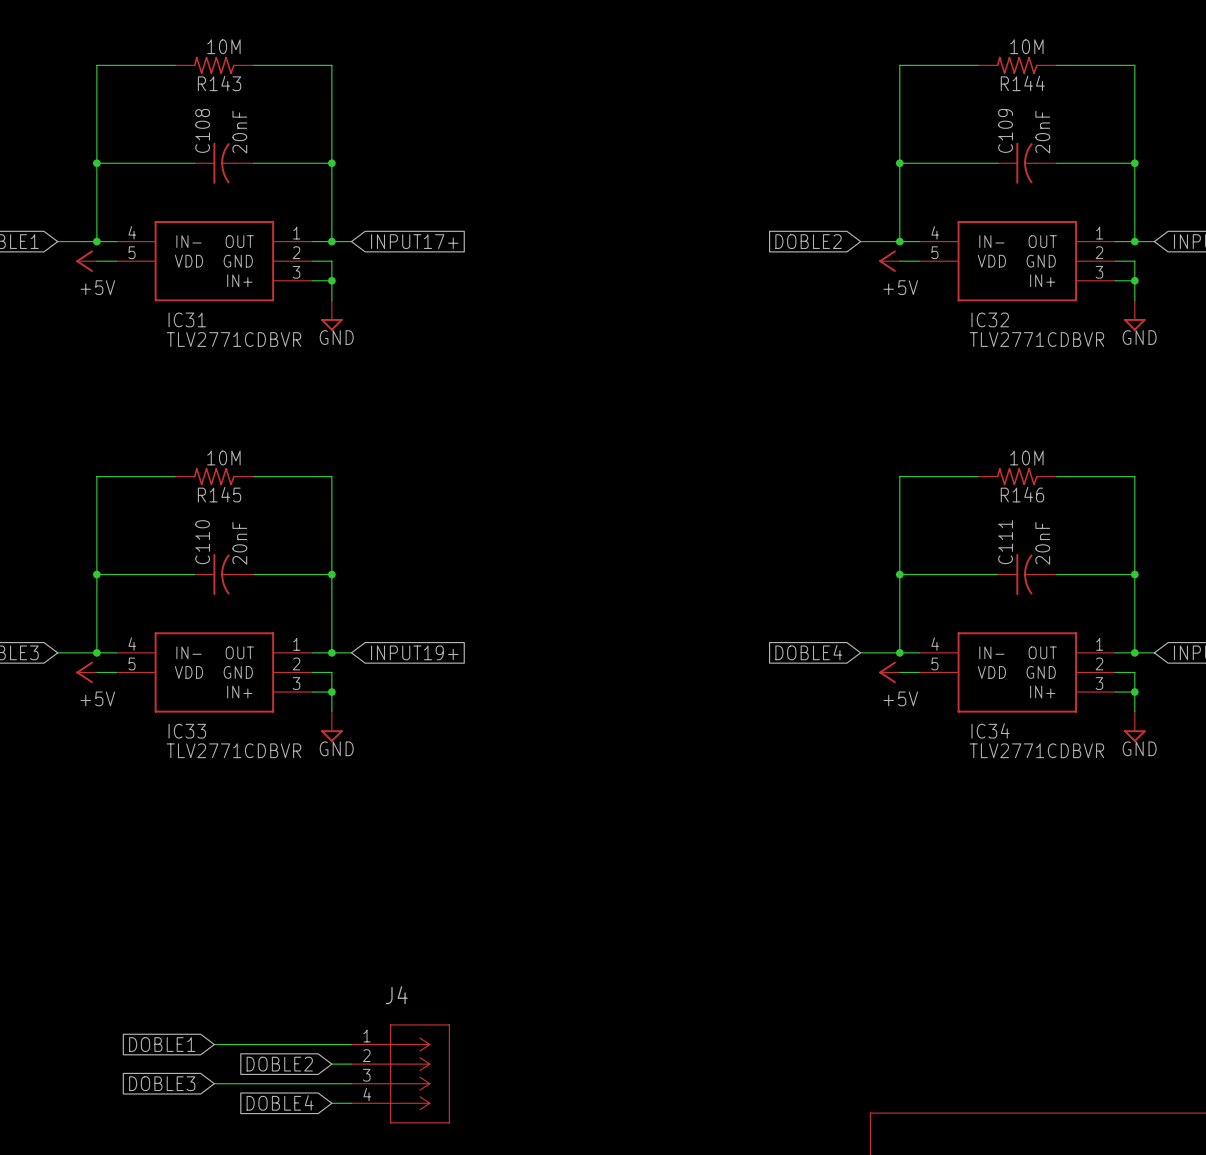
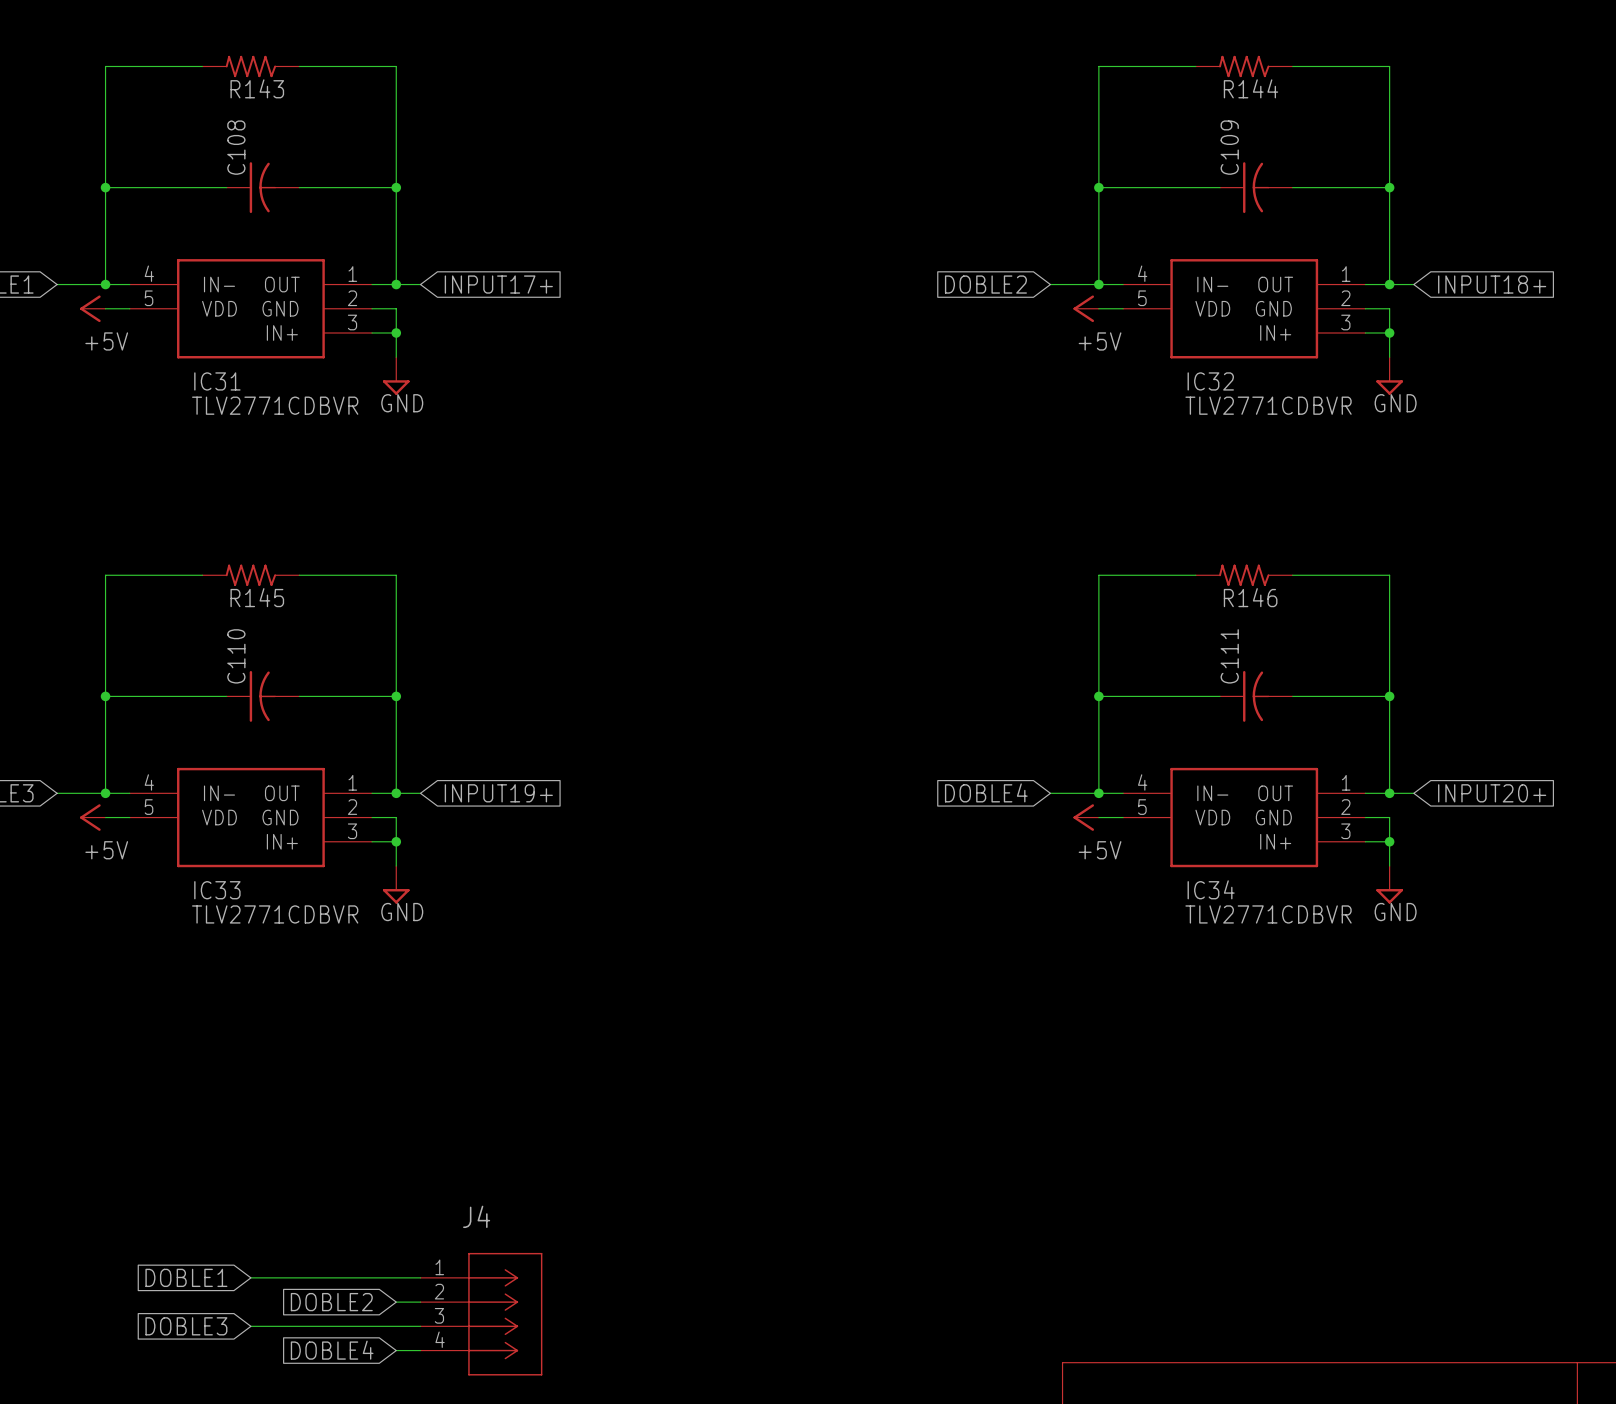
R143 value: 10M (223, 46) -> none
R144 value: 10M (1026, 46) -> none
C108 value: 20nF (239, 132) -> none
C109 value: 20nF (1042, 132) -> none
R145 value: 10M (223, 458) -> none
R146 value: 10M (1026, 458) -> none
C110 value: 20nF (239, 543) -> none
C111 value: 20nF (1042, 543) -> none

